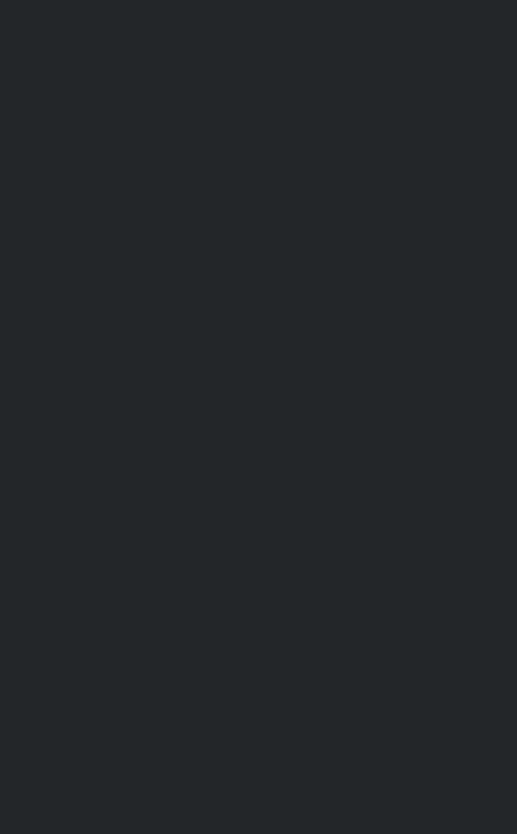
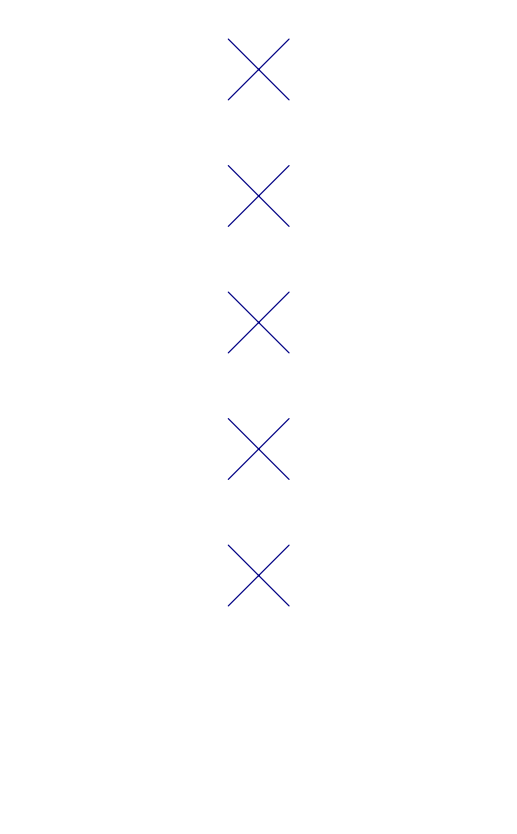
no-connect mark: none -> (258, 69)
no-connect mark: none -> (258, 195)
no-connect mark: none -> (258, 322)
no-connect mark: none -> (258, 449)
no-connect mark: none -> (258, 575)

